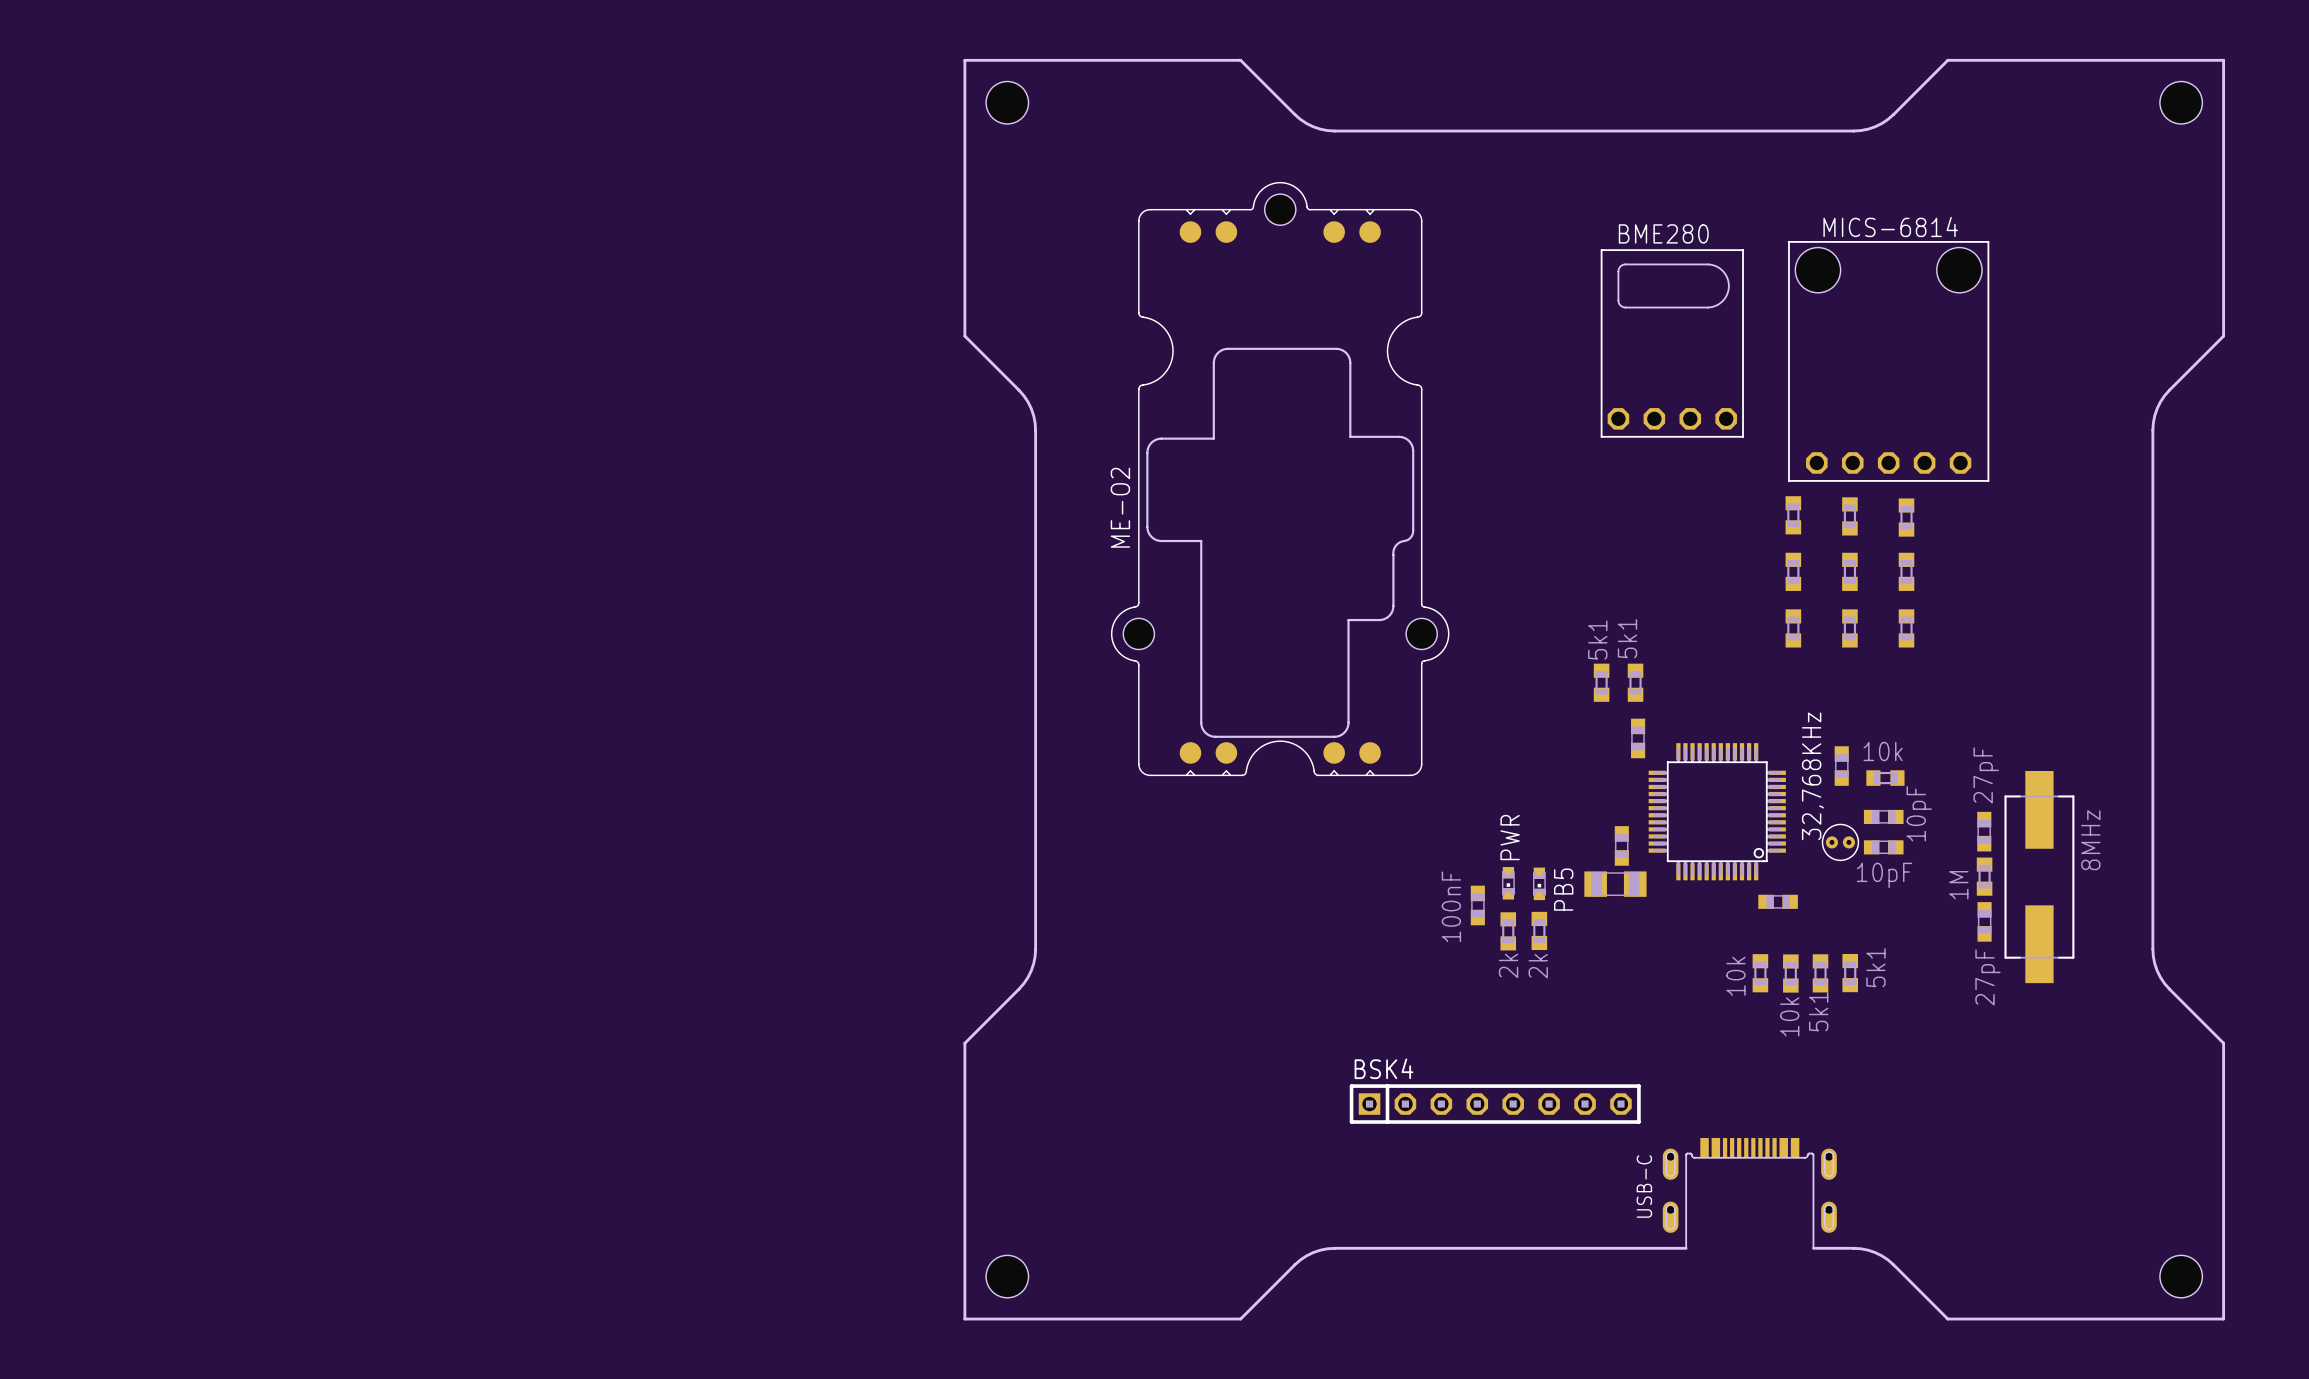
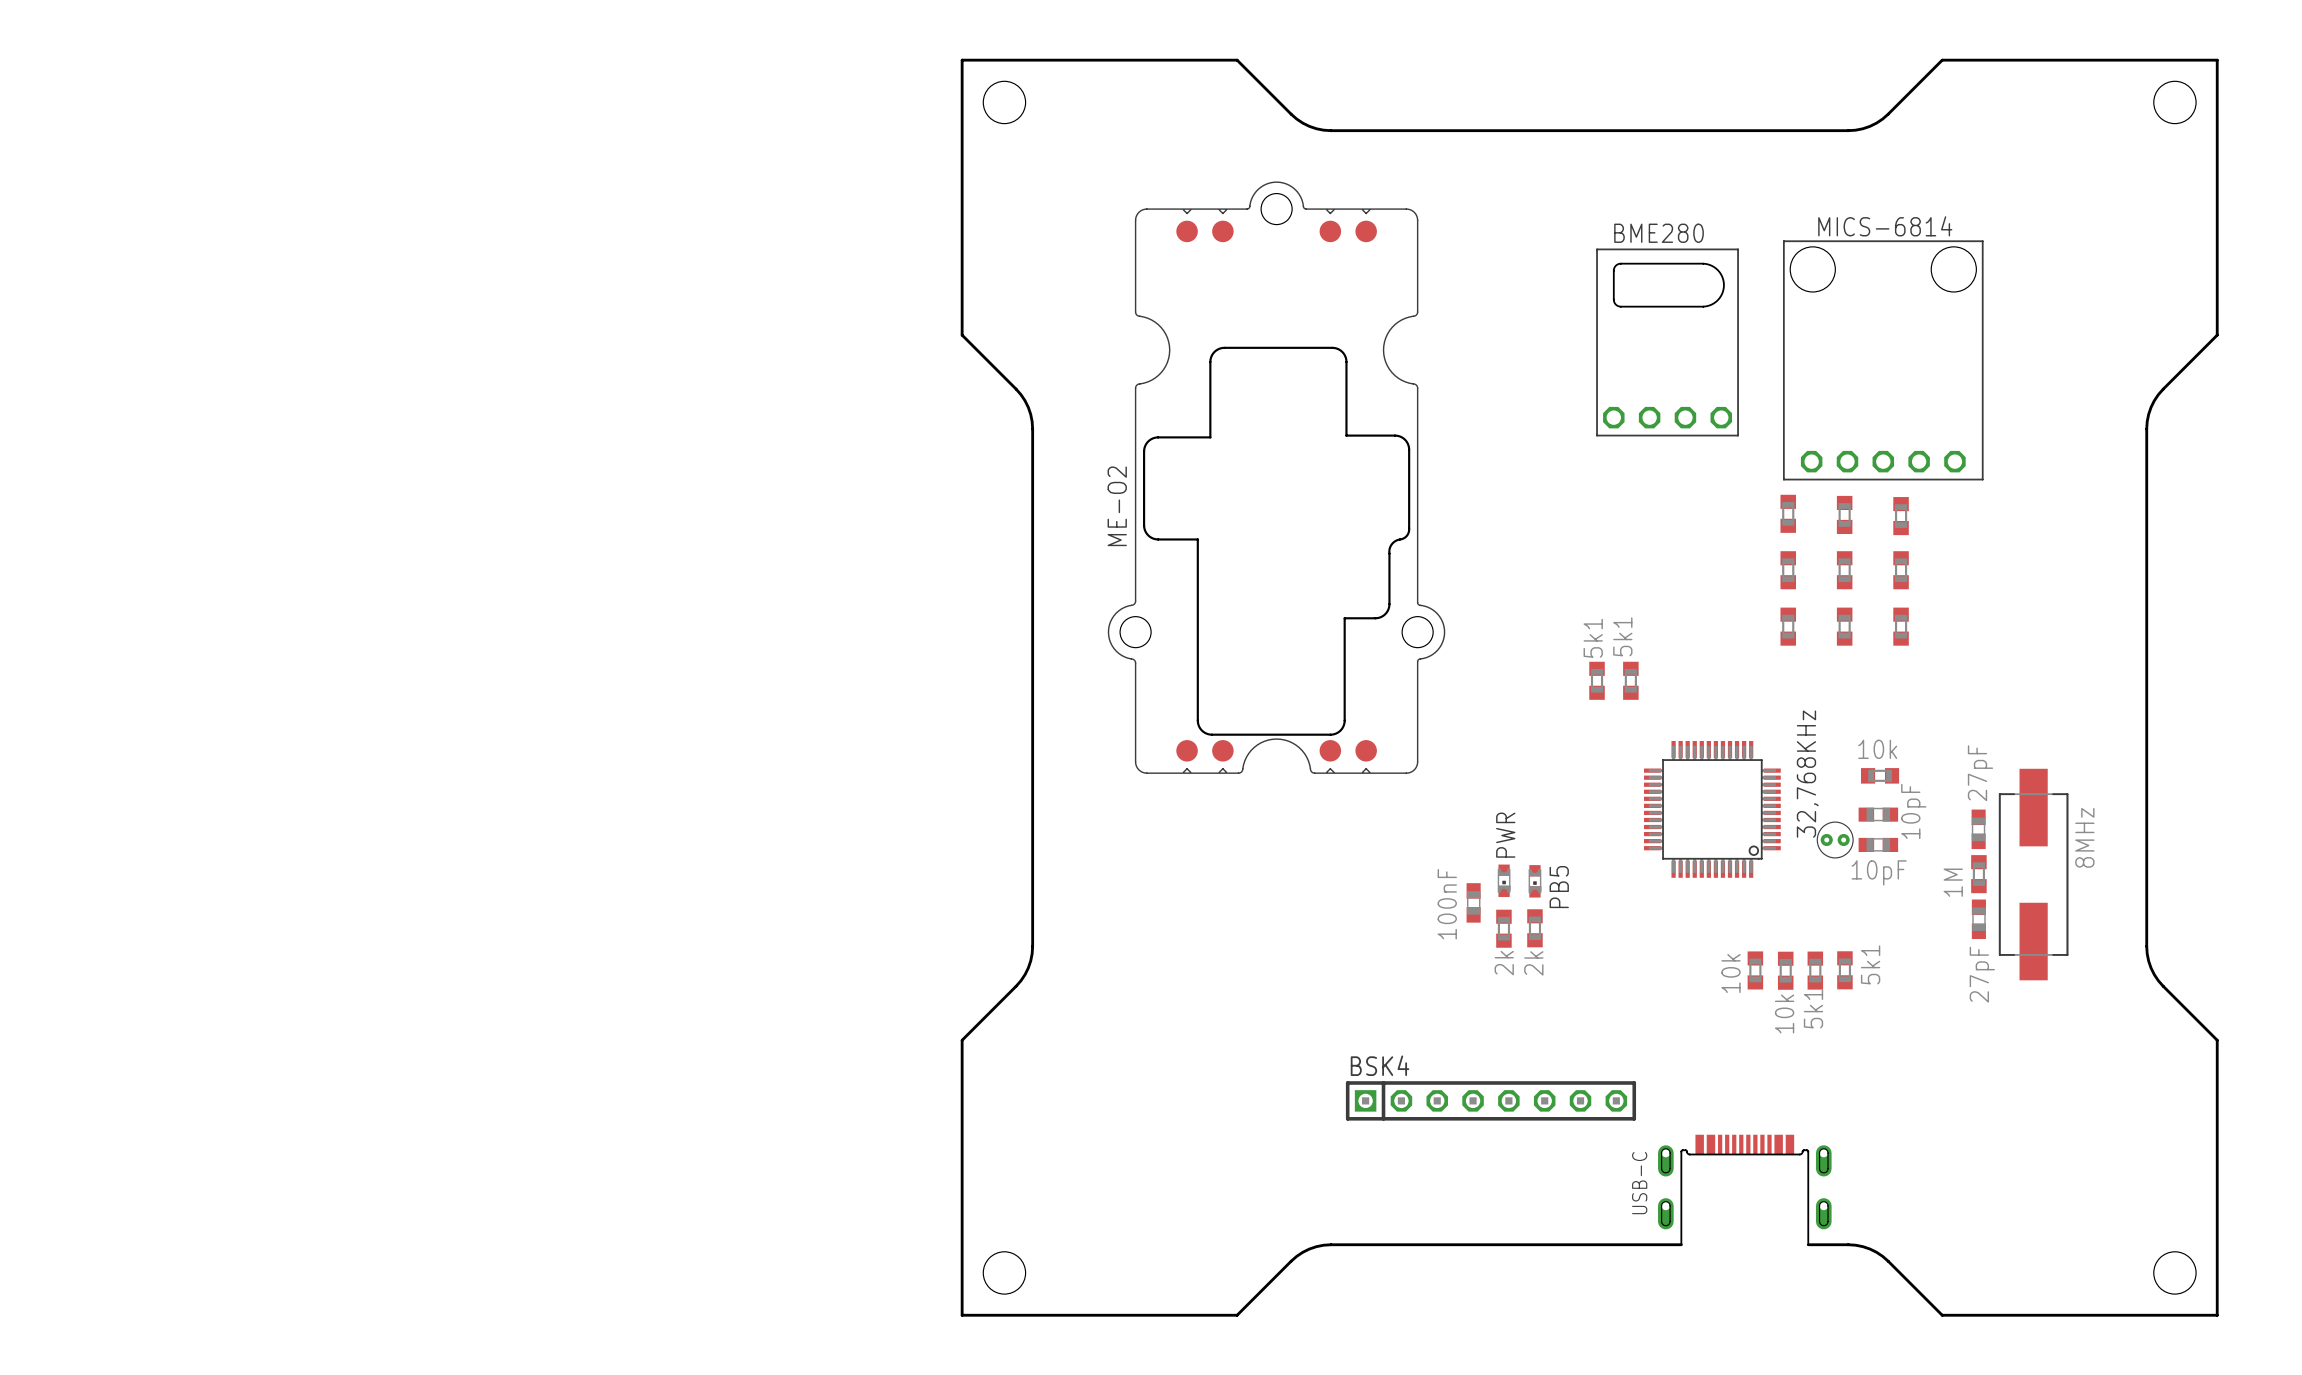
part: (1638, 738) -> none
part: (1841, 766) -> none
part: (1621, 845) -> none
part: (1615, 884) -> none
part: (1778, 901) -> none

